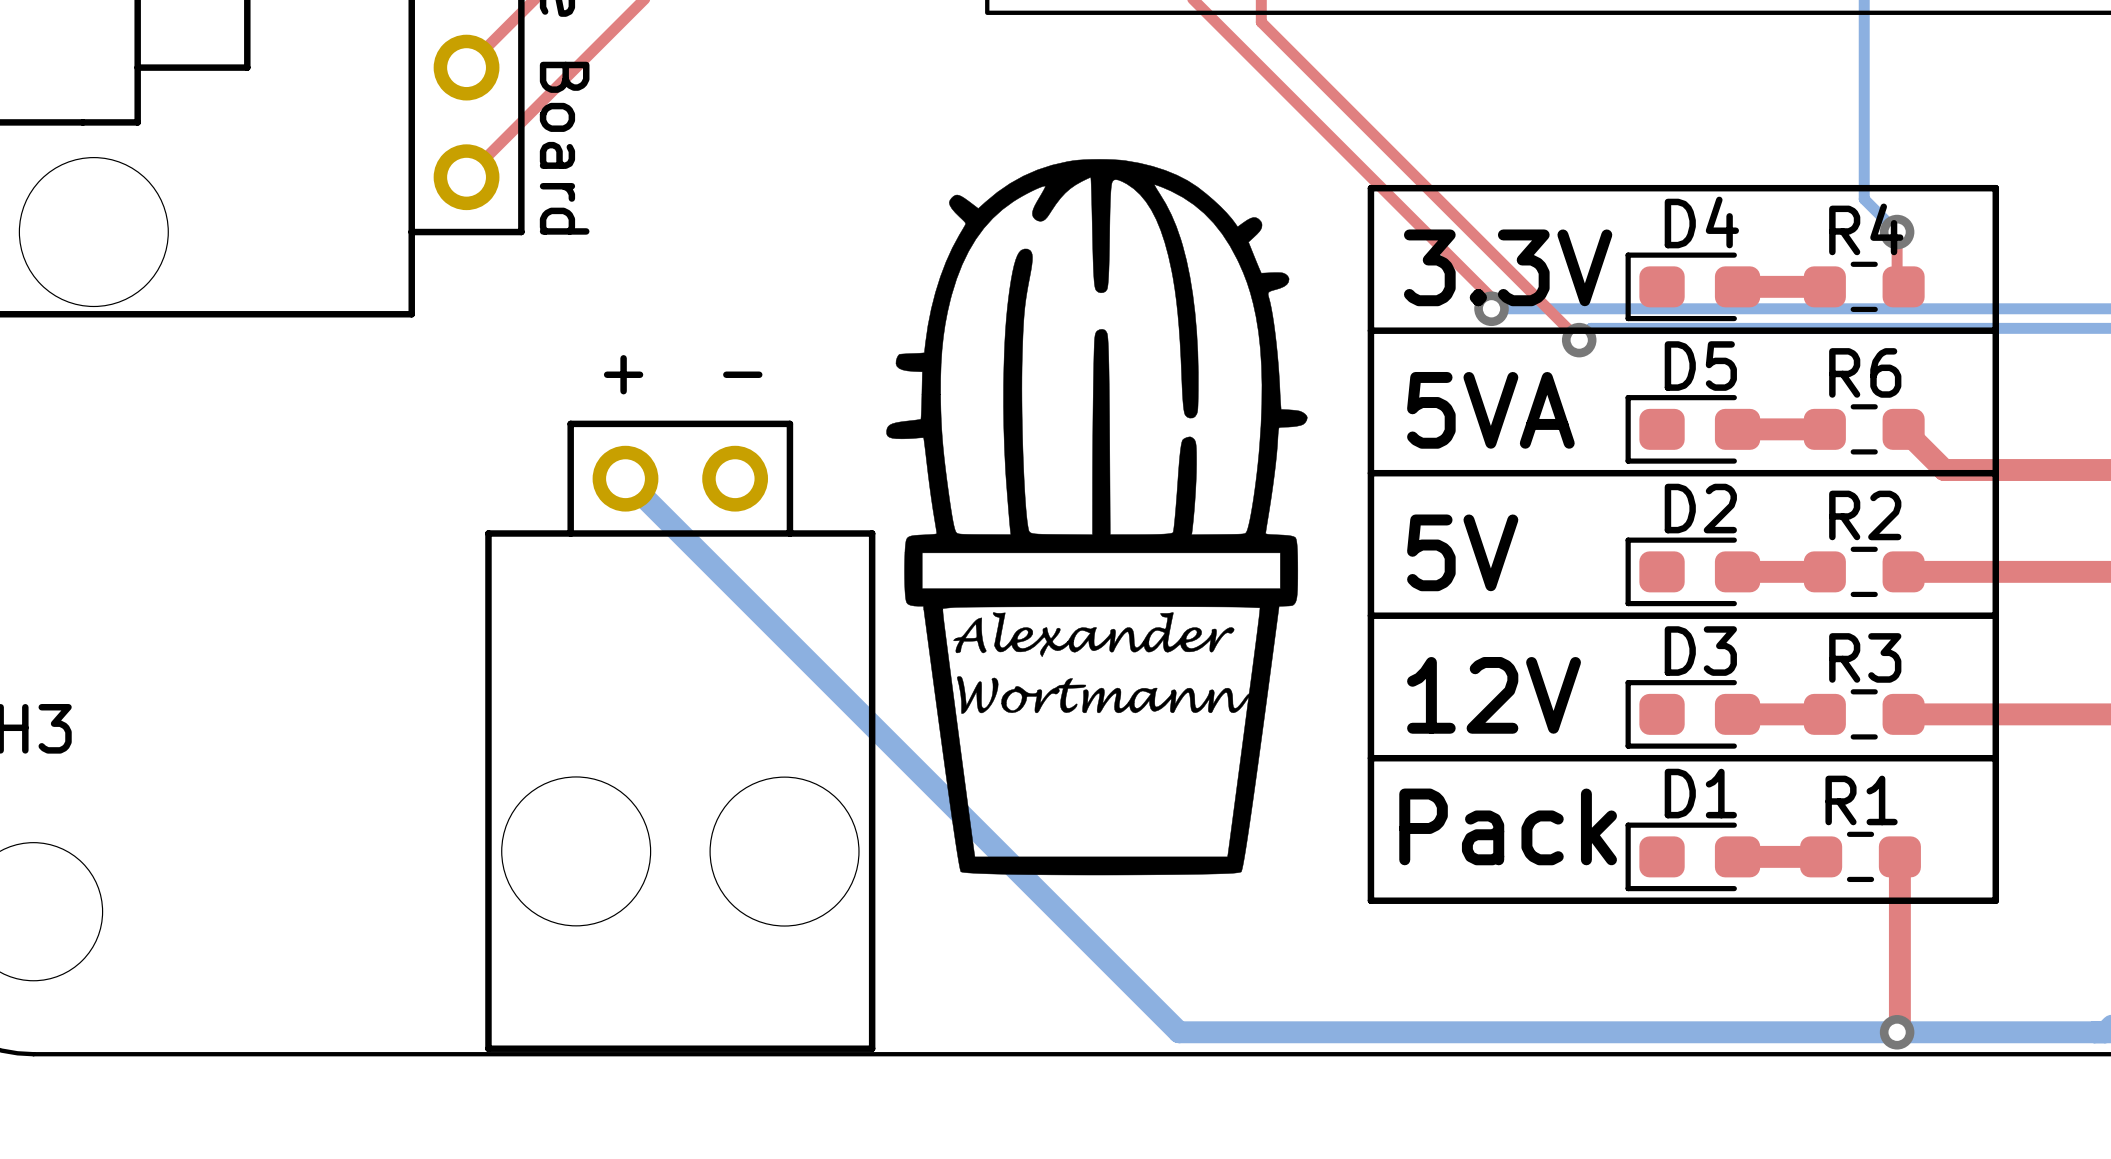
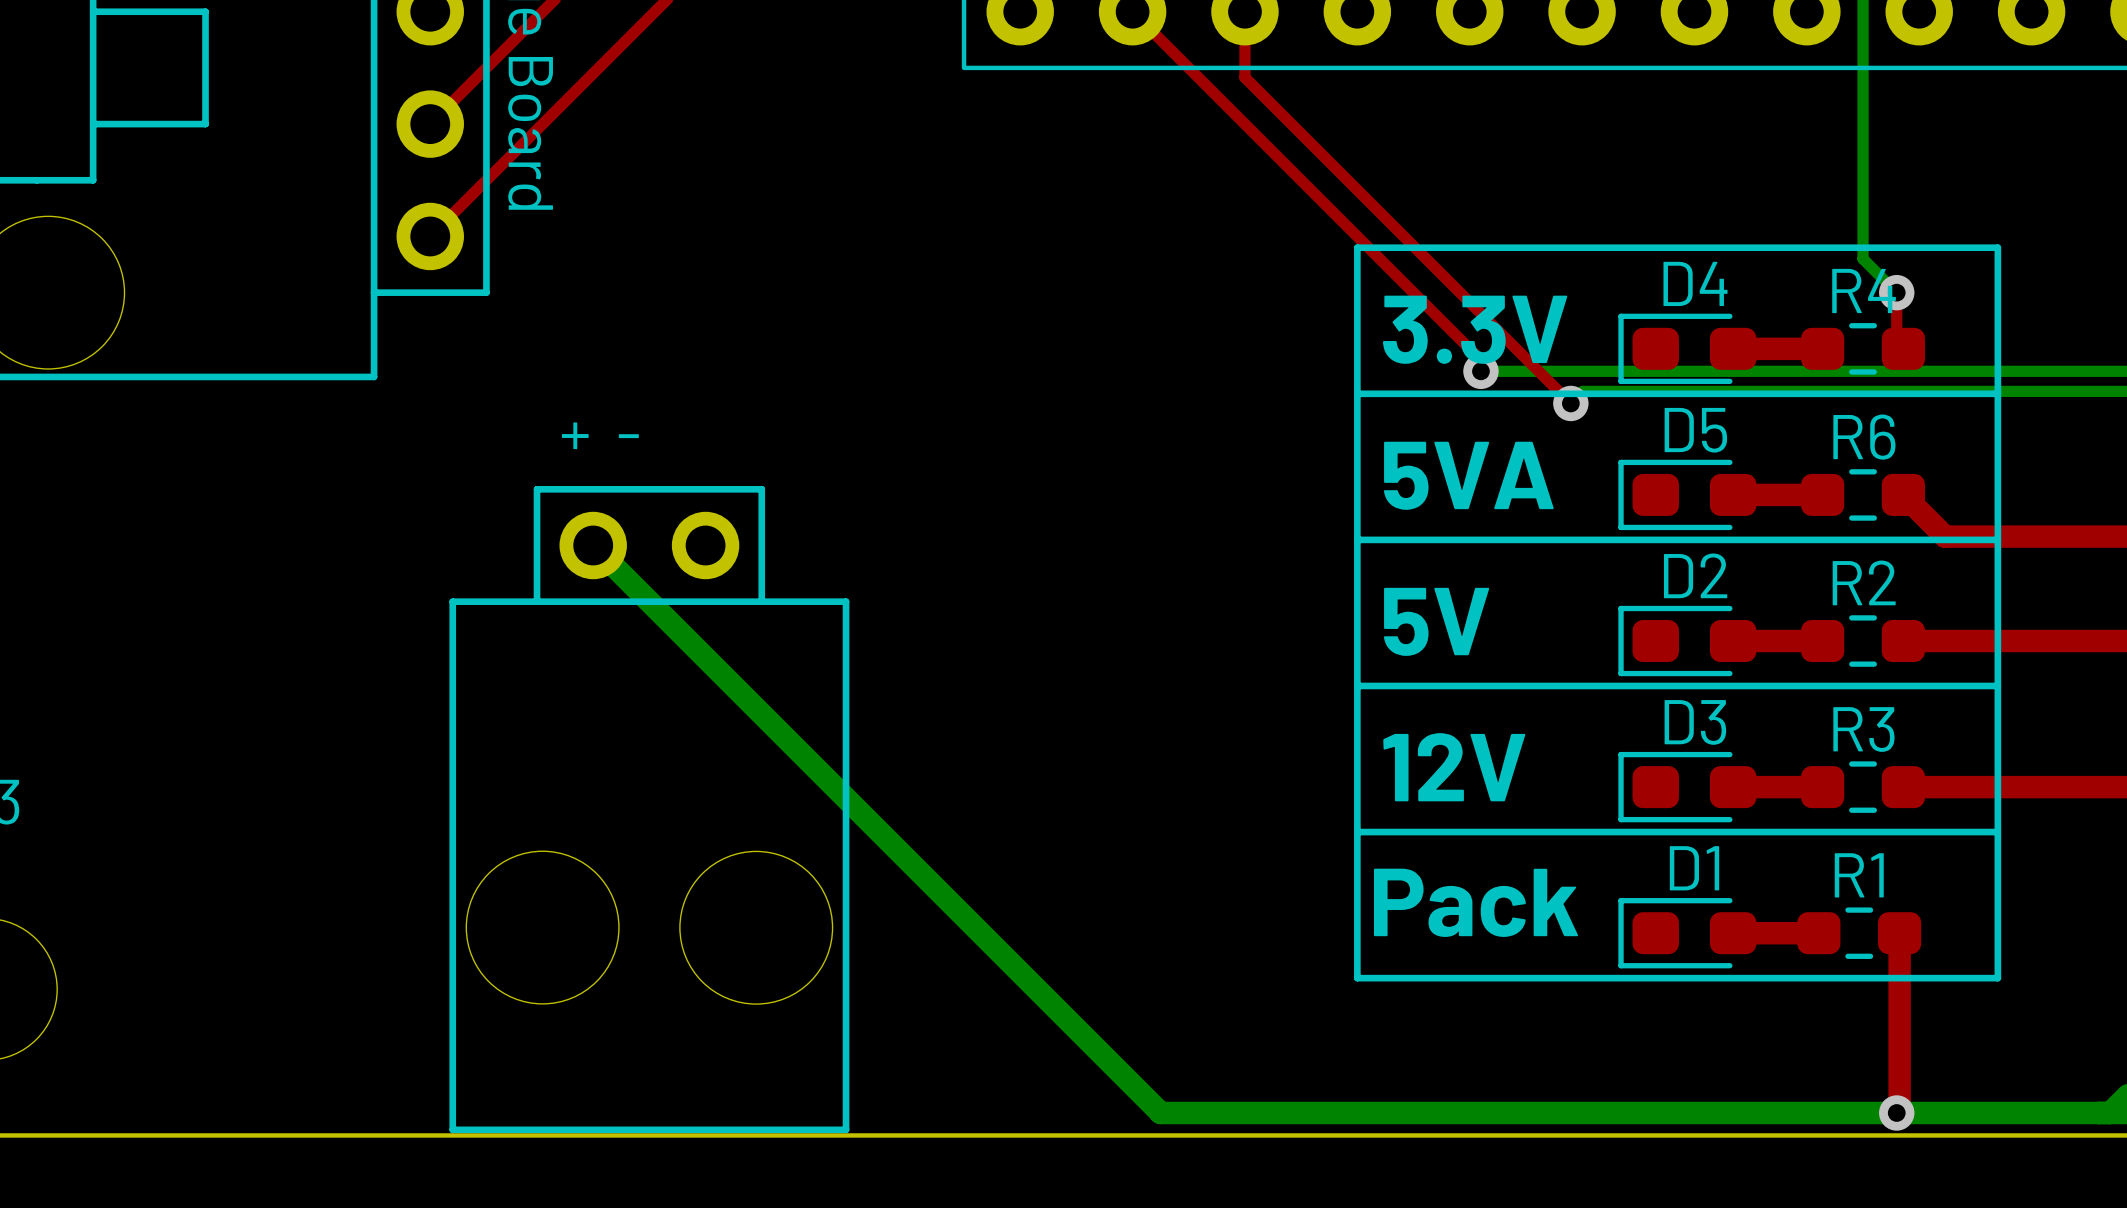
drawing: [886, 159, 1308, 876] -> none

